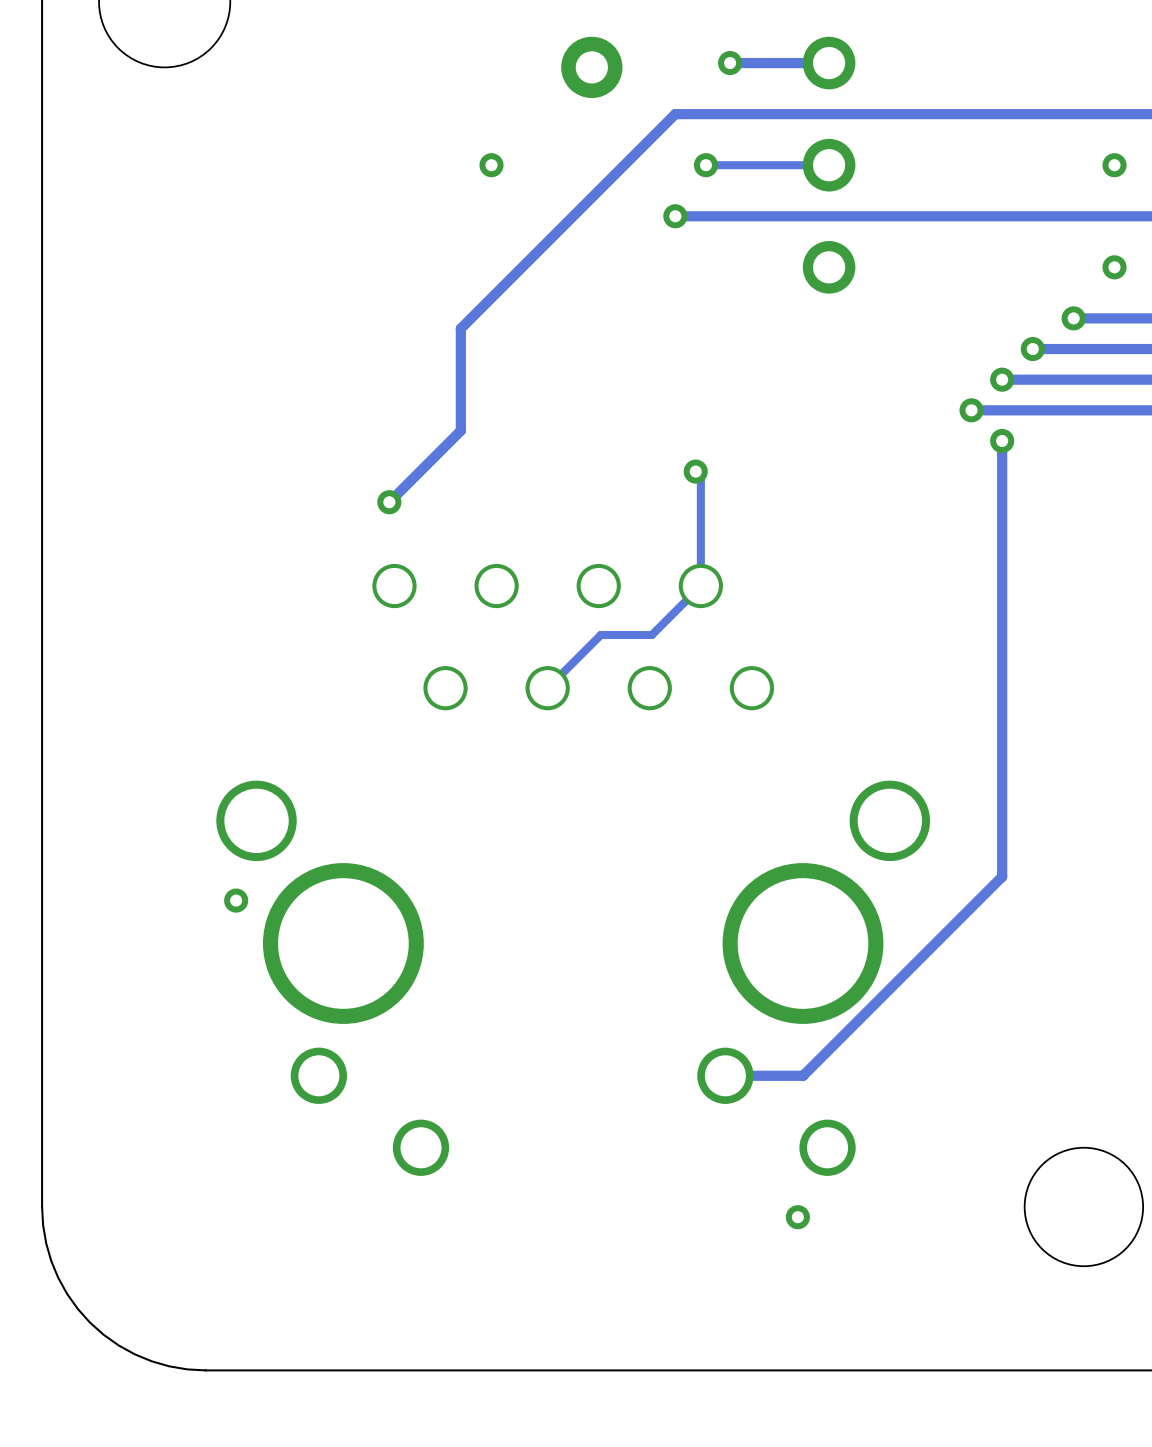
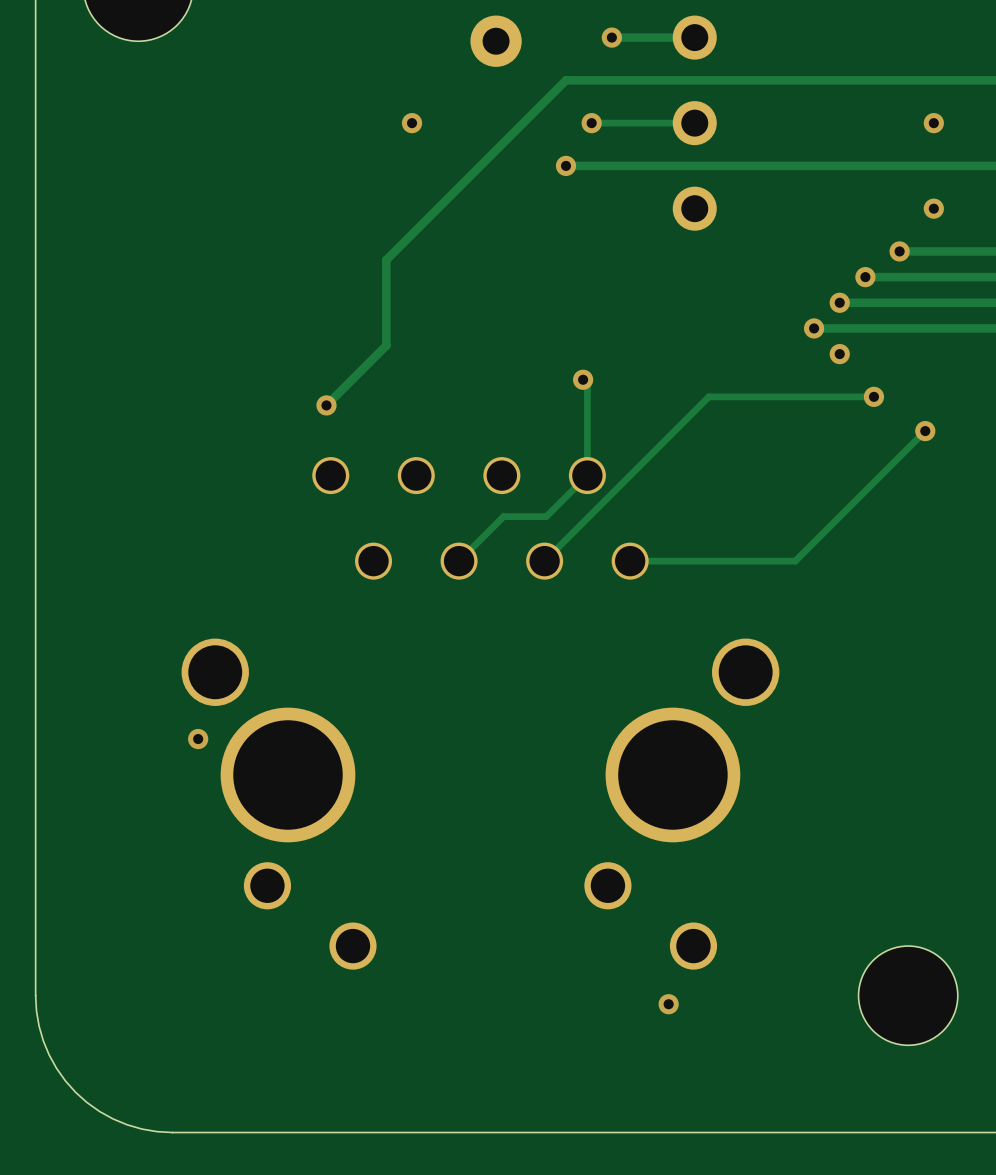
track: (1002, 440) (1002, 876) (803, 1075) (725, 1075) -> none
track: none -> (873, 396) (708, 396) (544, 561)
via: none -> (873, 396)
track: none -> (925, 431) (795, 561) (630, 561)
via: none -> (925, 431)

